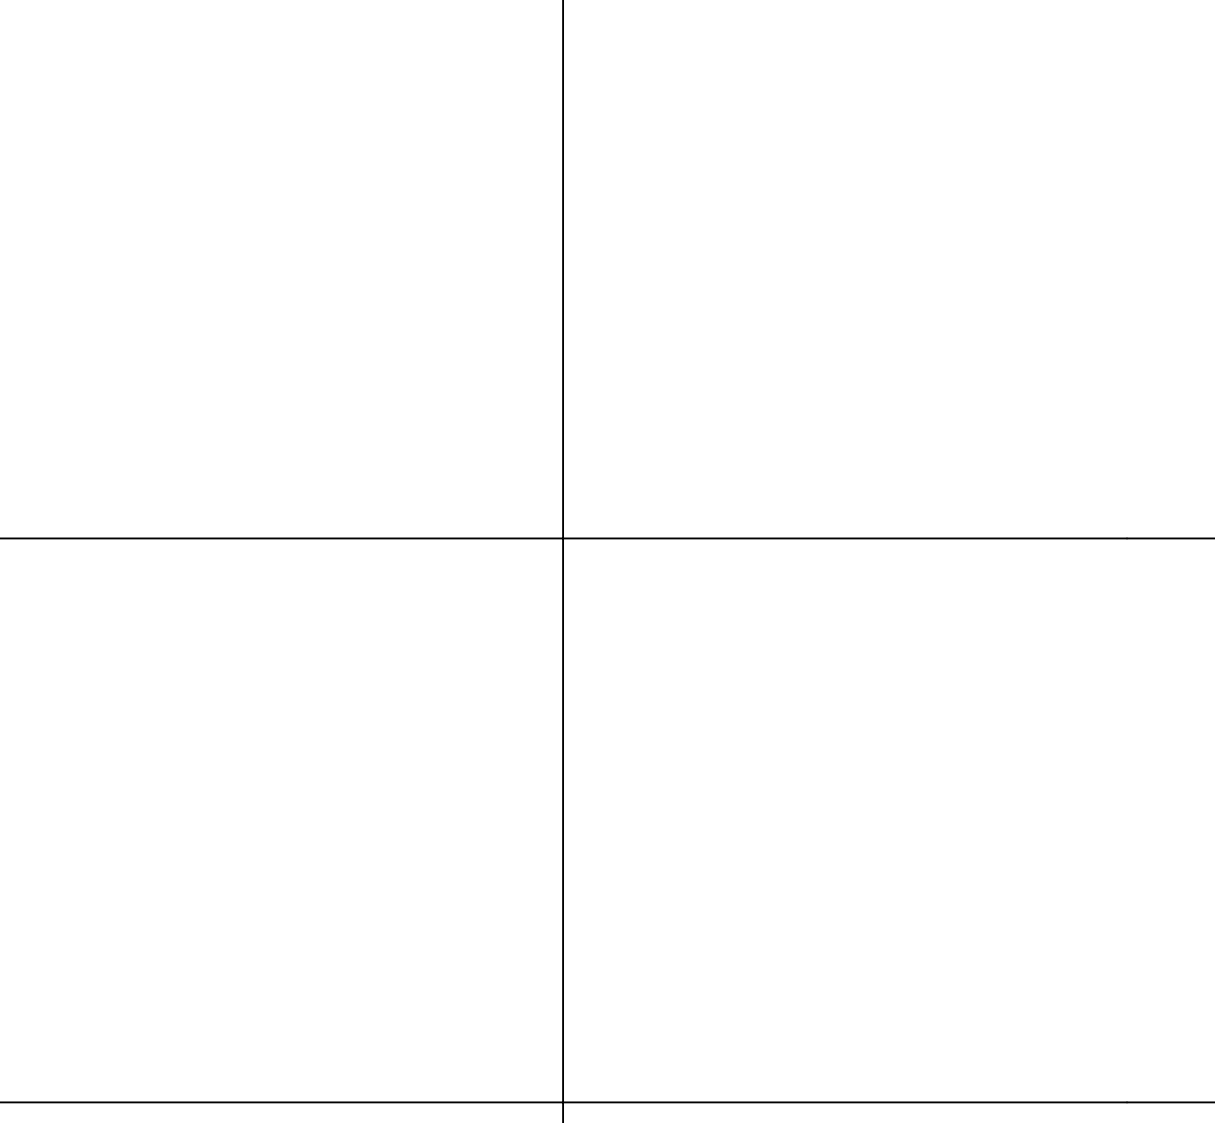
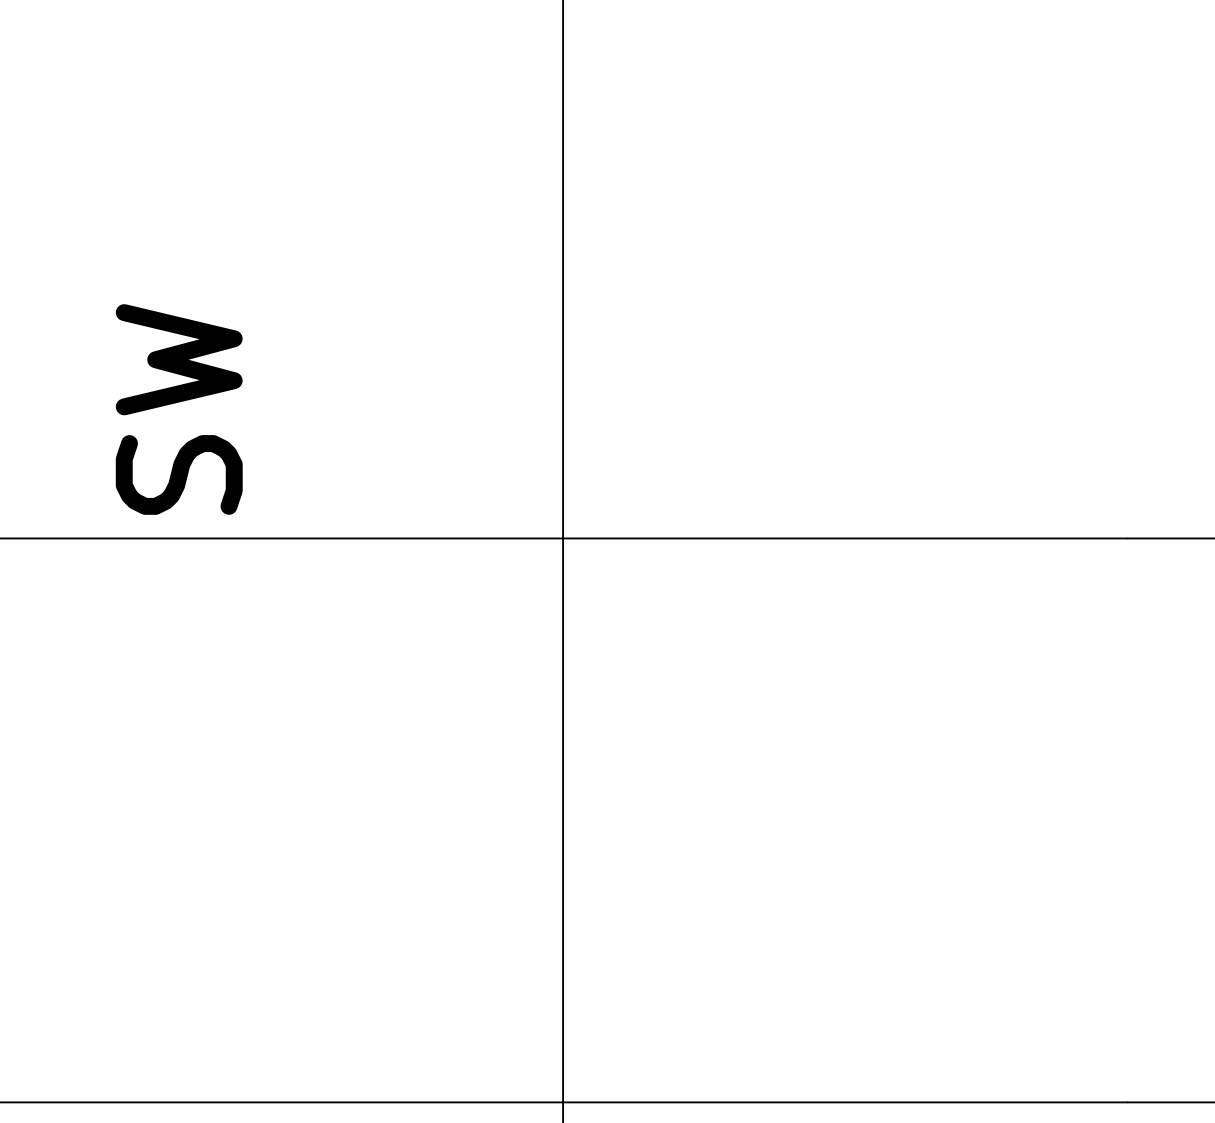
label: none -> SW (179, 409)

